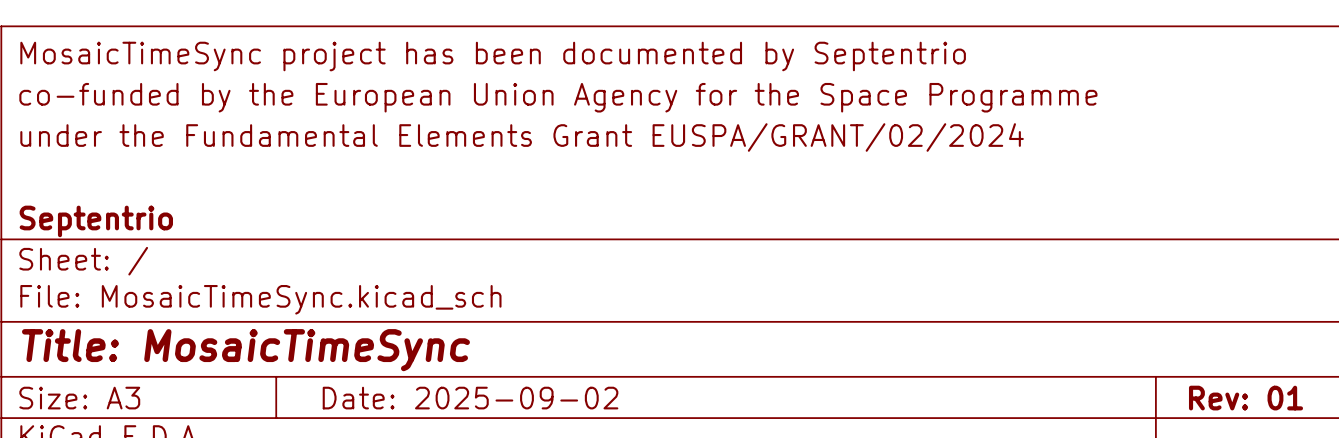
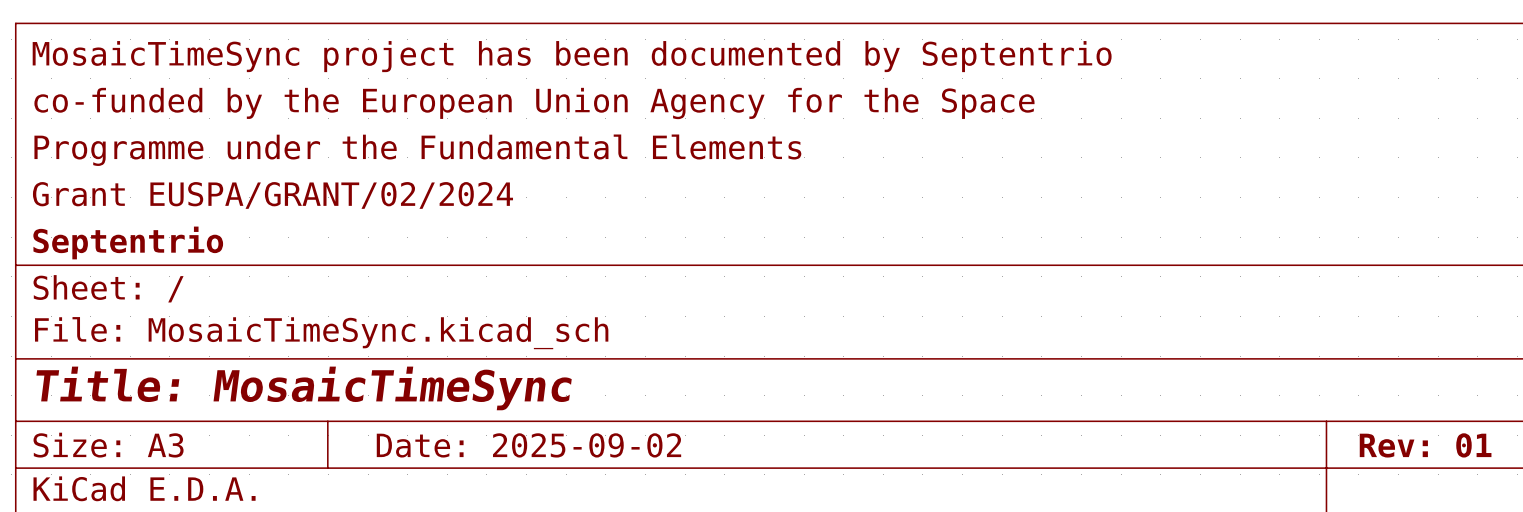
title block: co-funded by the European Union Agency for the Space Programme (558, 97) -> co-funded by the European Union Agency for the Space (534, 103)
title block: under the Fundamental Elements Grant EUSPA/GRANT/02/2024 (522, 137) -> Programme under the Fundamental Elements (417, 150)
title block: none -> Grant EUSPA/GRANT/02/2024 (272, 195)

